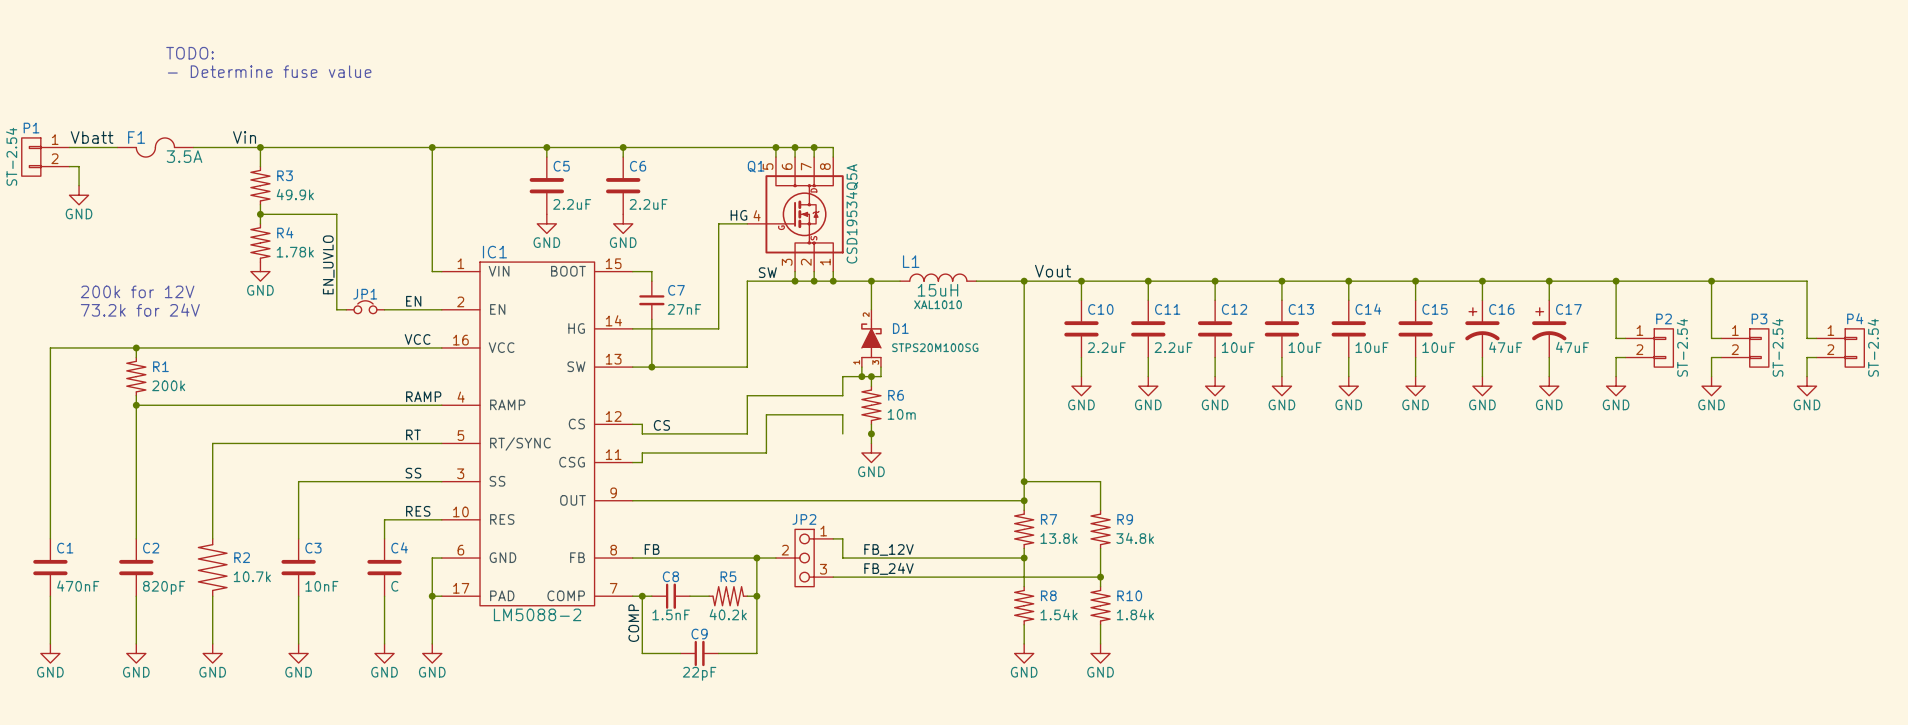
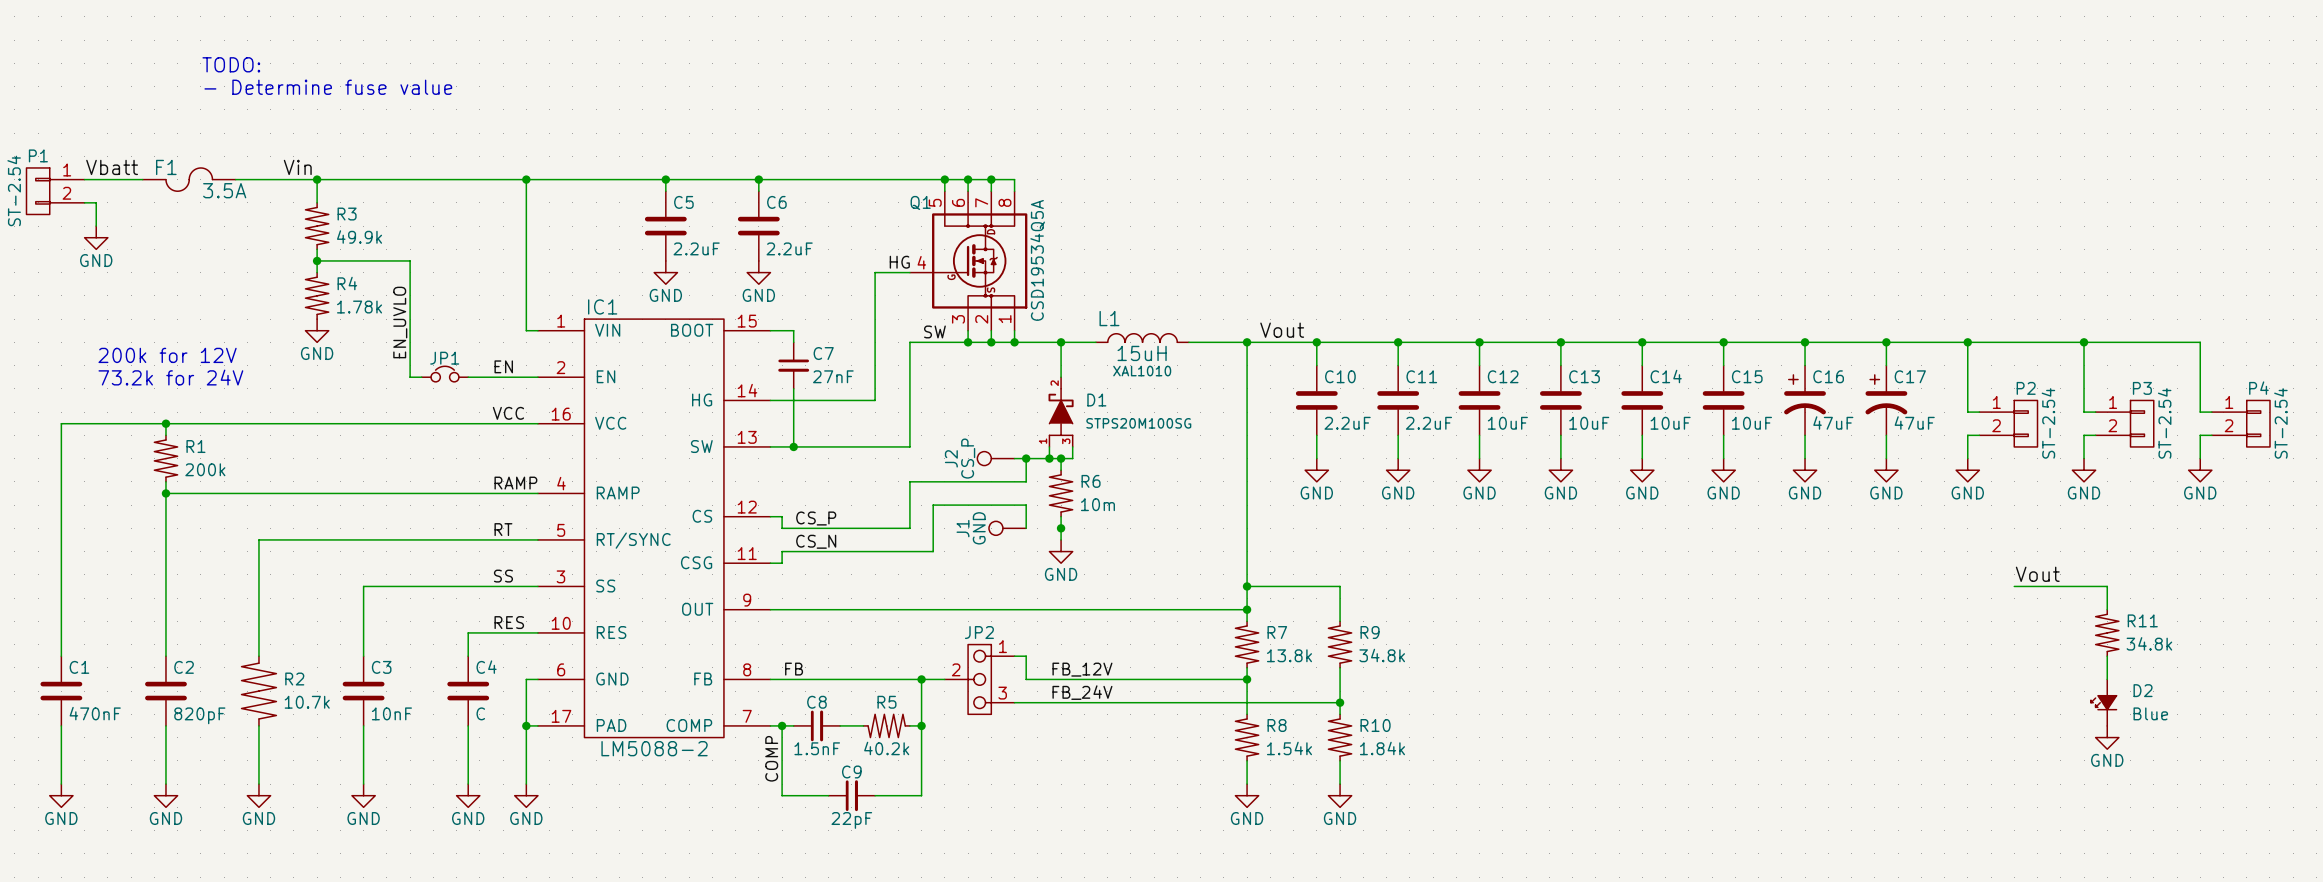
J2: none -> CS_P (995, 458)
wire: none -> (1014, 458) (1026, 458)
junction: none -> (1026, 458)
label: CS (661, 425) -> CS_P (816, 518)
J1: none -> GND (1007, 528)
label: none -> CS_N (816, 541)
label: none -> Vout (2037, 574)
wire: none -> (2014, 586) (2107, 586) (2107, 609)
R11: none -> 34.8k (2107, 632)
wire: none -> (2107, 656) (2107, 679)
D2: none -> Blue (2103, 702)
power symbol: none -> GND (2107, 737)

